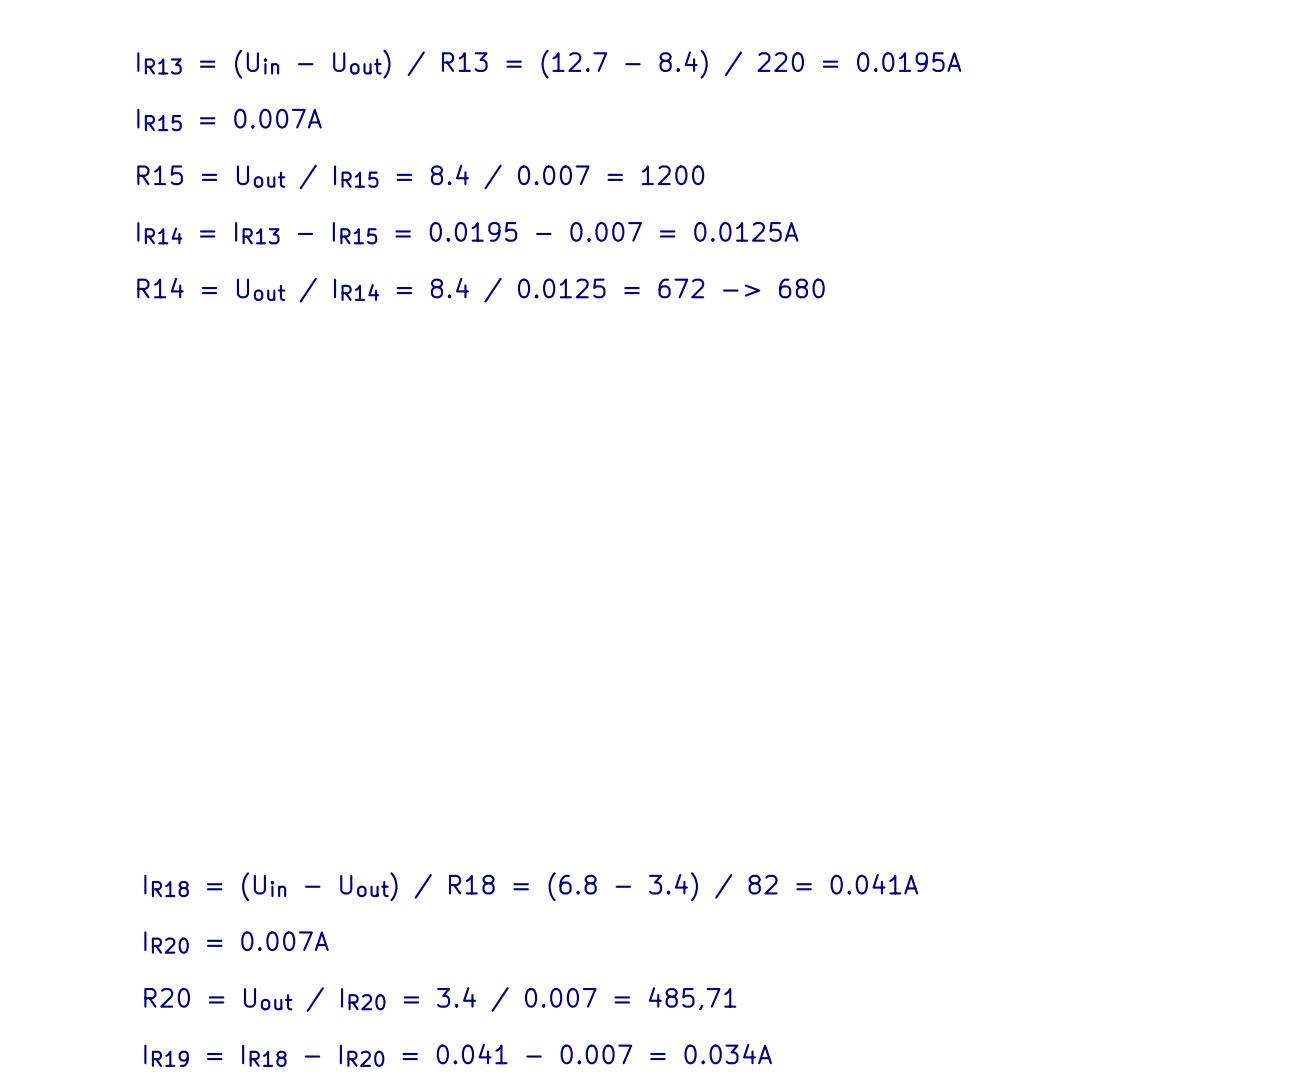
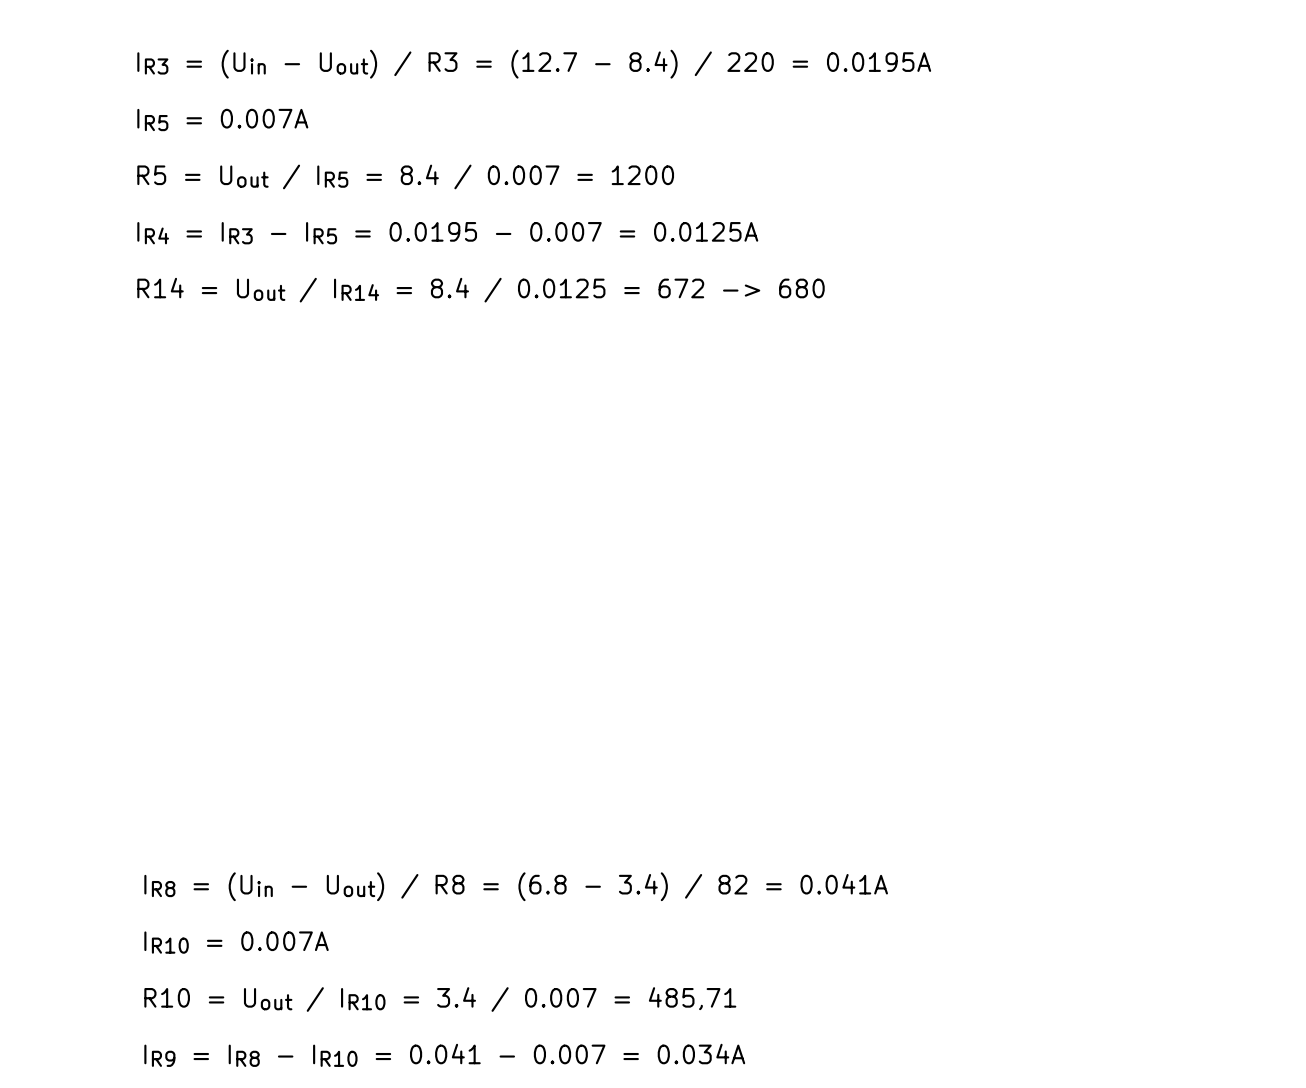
text: IR13 = (Uin - Uout) / R13 = (12.7 - 8.4) / 220 = 0.0195A (549, 64) -> IR3 = (Uin - Uout) / R3 = (12.7 - 8.4) / 220 = 0.0195A (534, 64)
text: IR15 = 0.007A (229, 120) -> IR5 = 0.007A (222, 120)
text: R15 = Uout / IR15 = 8.4 / 0.007 = 1200 (420, 176) -> R5 = Uout / IR5 = 8.4 / 0.007 = 1200 (405, 176)
text: IR14 = IR13 - IR15 = 0.0195 - 0.007 = 0.0125A (467, 233) -> IR4 = IR3 - IR5 = 0.0195 - 0.007 = 0.0125A (447, 233)
text: IR18 = (Uin - Uout) / R18 = (6.8 - 3.4) / 82 = 0.041A (531, 886) -> IR8 = (Uin - Uout) / R8 = (6.8 - 3.4) / 82 = 0.041A (516, 886)
text: IR20 = 0.007A (236, 942) -> IR10 = 0.007A (236, 942)
text: R20 = Uout / IR20 = 3.4 / 0.007 = 485,71 (440, 999) -> R10 = Uout / IR10 = 3.4 / 0.007 = 485,71 (440, 999)
text: IR19 = IR18 - IR20 = 0.041 - 0.007 = 0.034A (458, 1055) -> IR9 = IR8 - IR10 = 0.041 - 0.007 = 0.034A (444, 1055)

